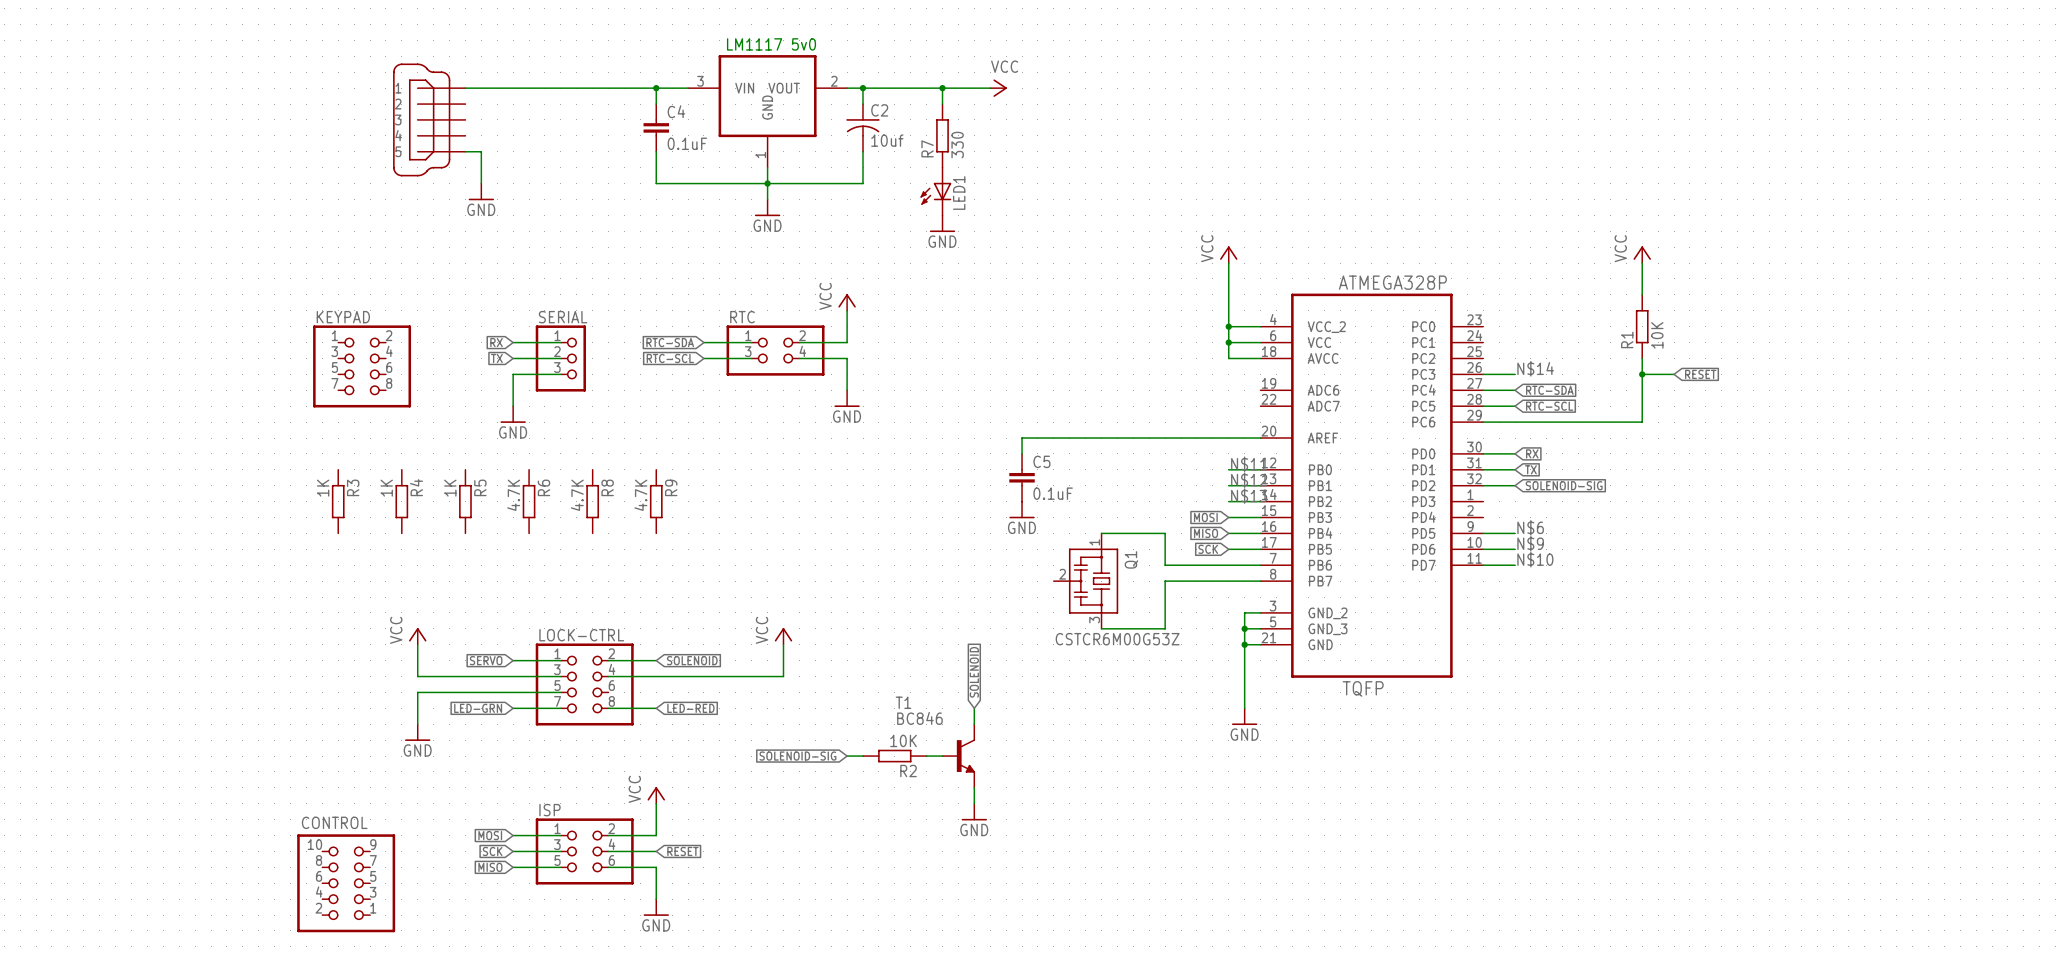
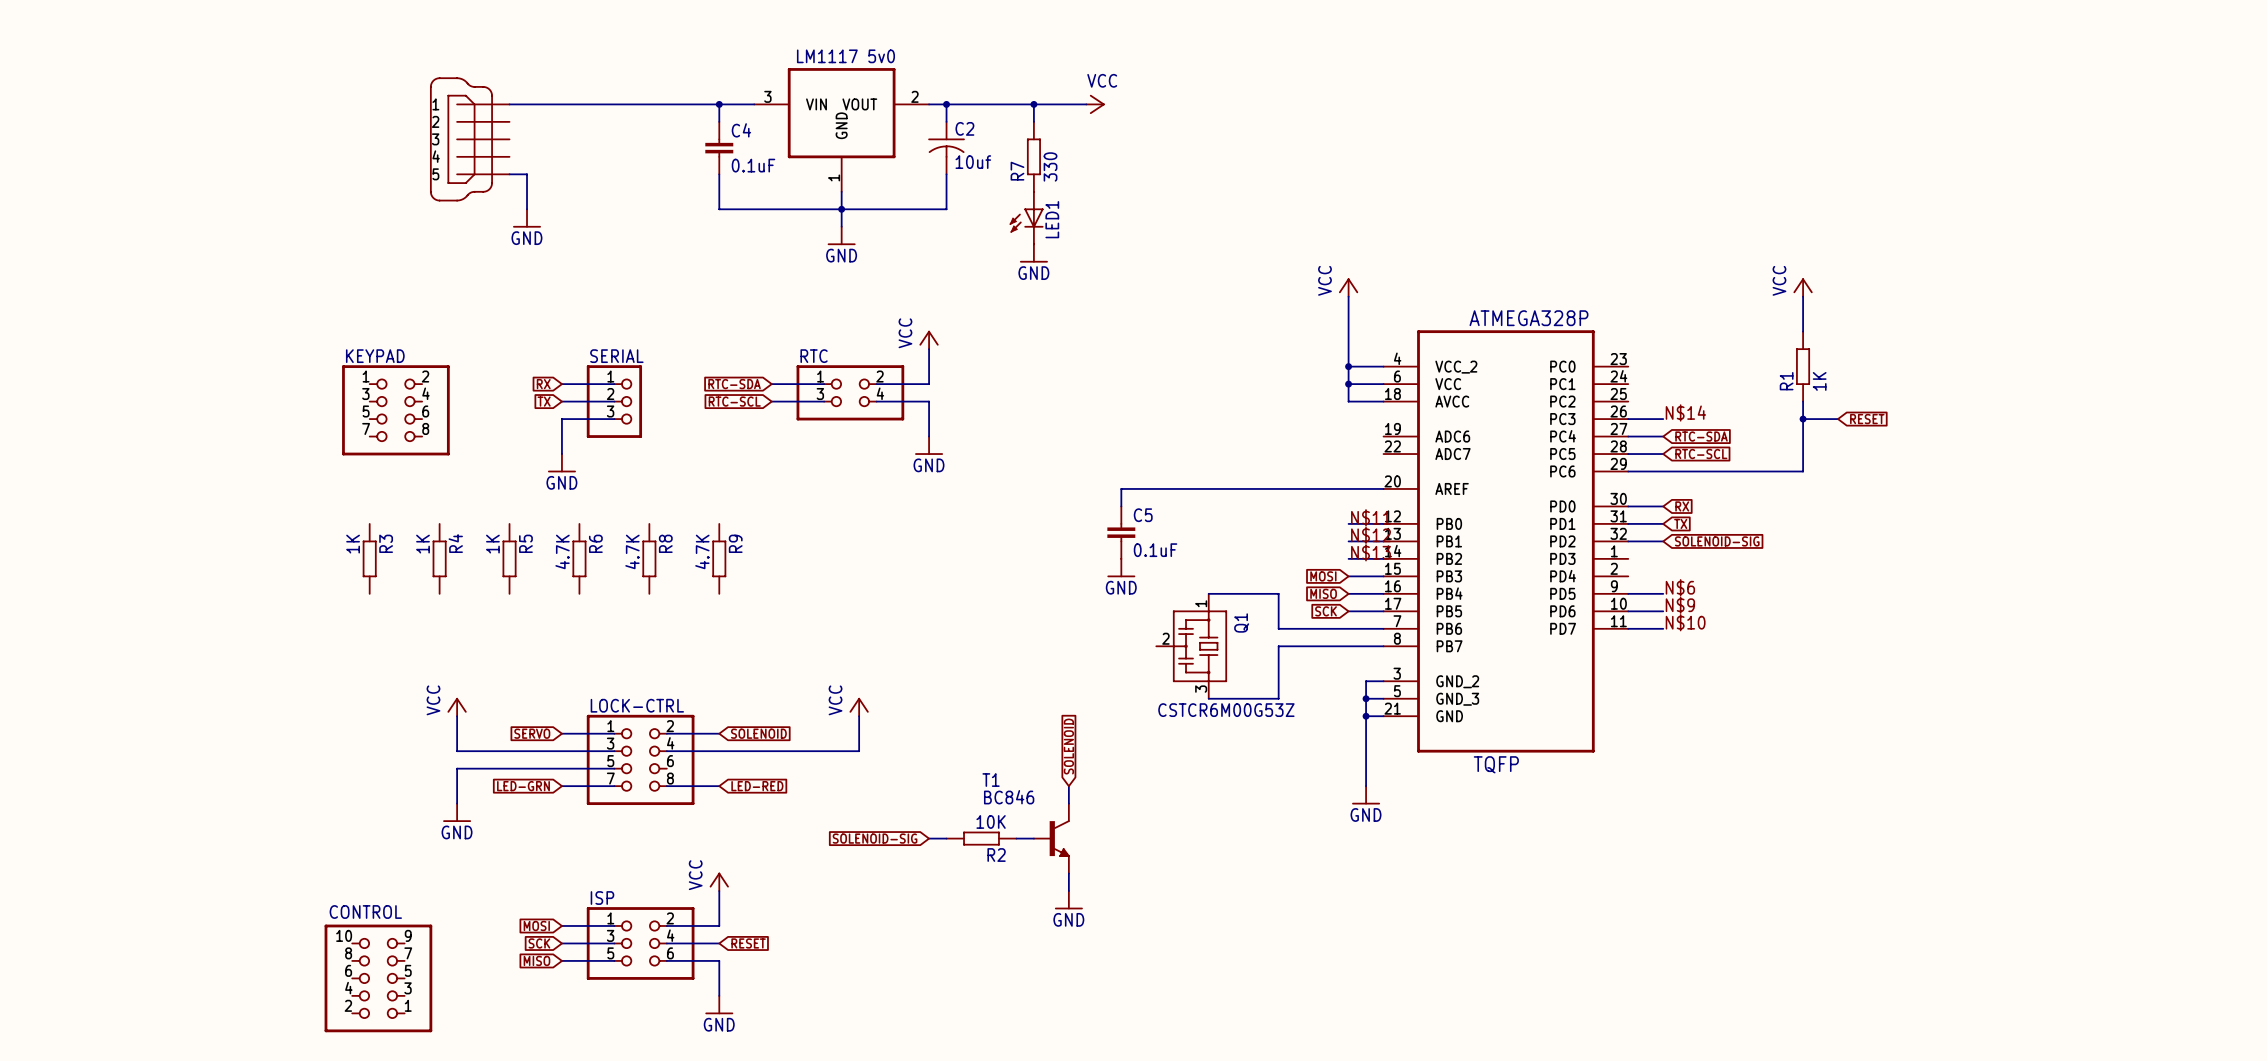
R1 value: 10K (1657, 335) -> 1K (1819, 381)

